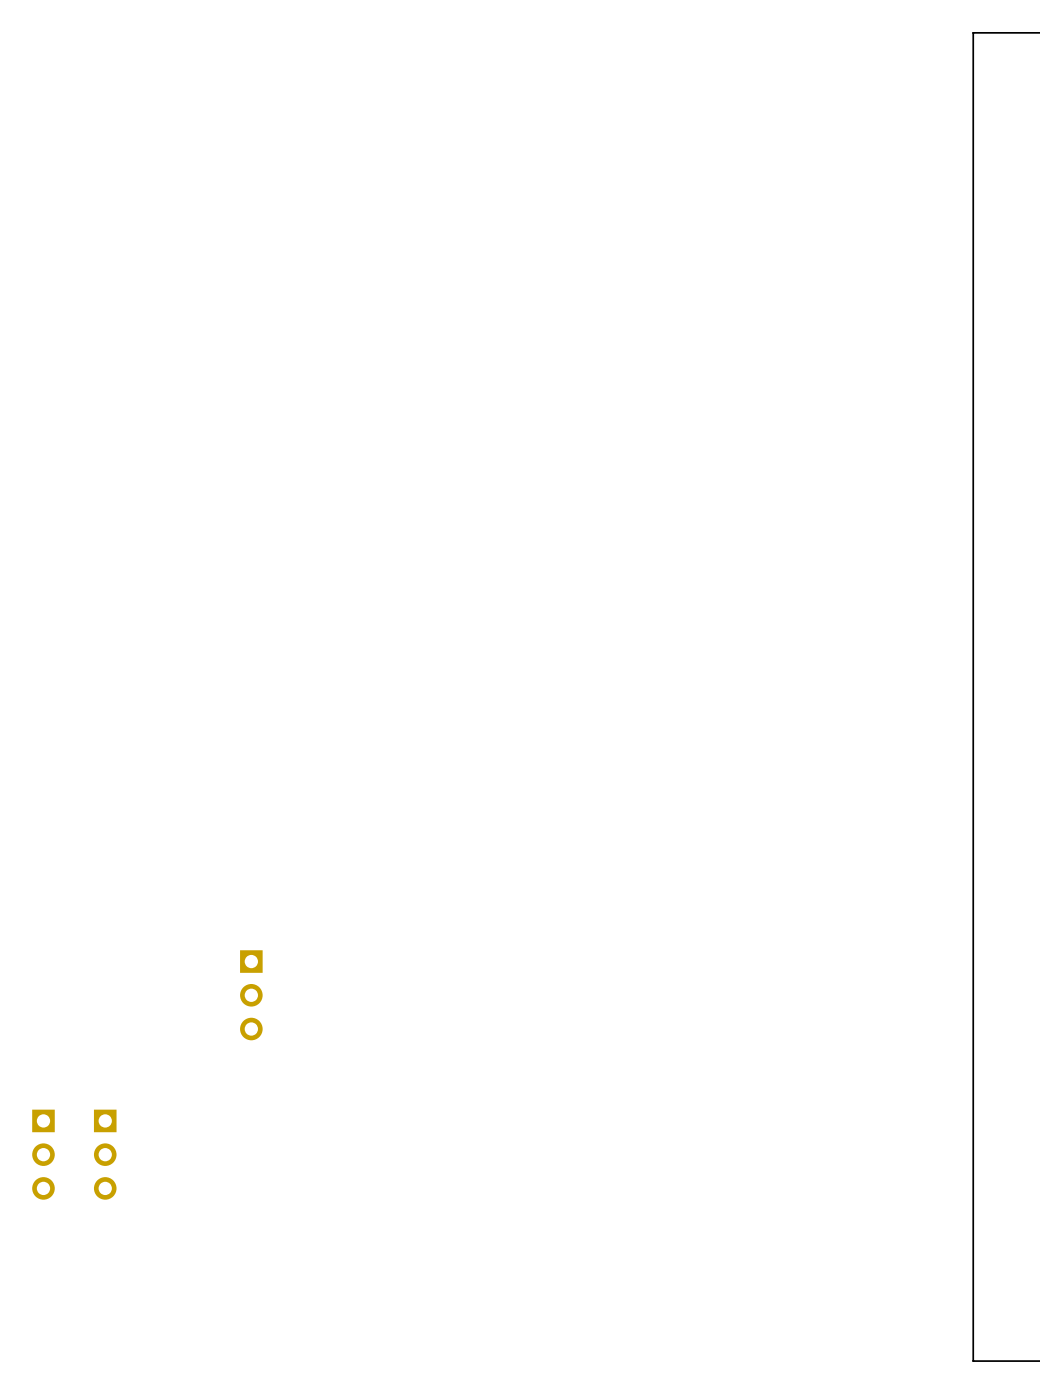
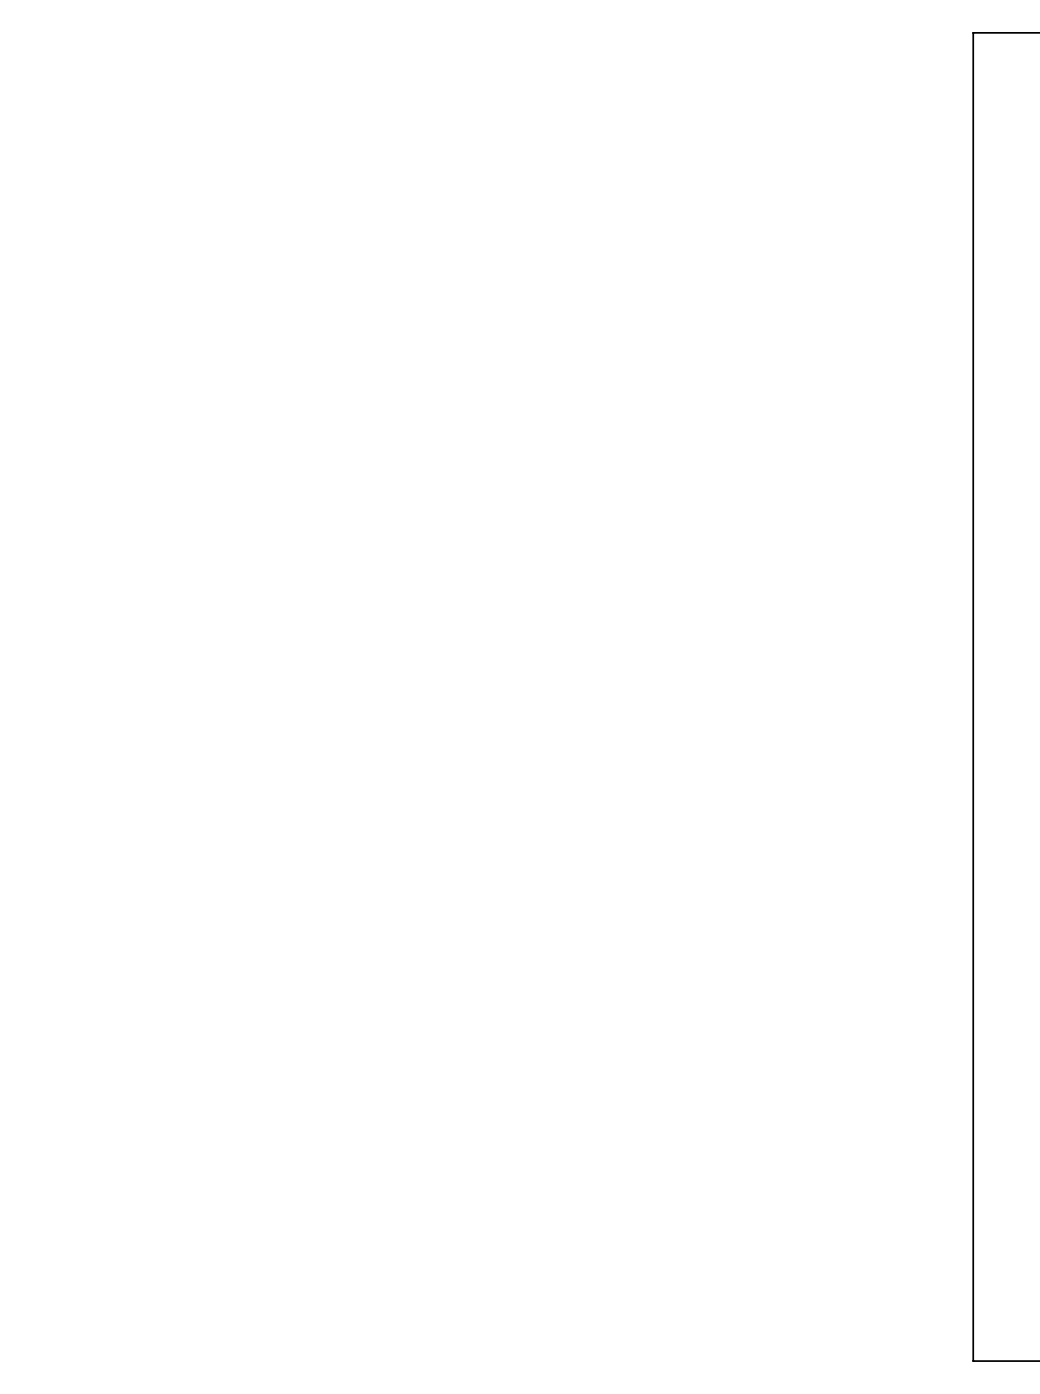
part: (251, 995) -> none
part: (43, 1154) -> none
part: (105, 1154) -> none

